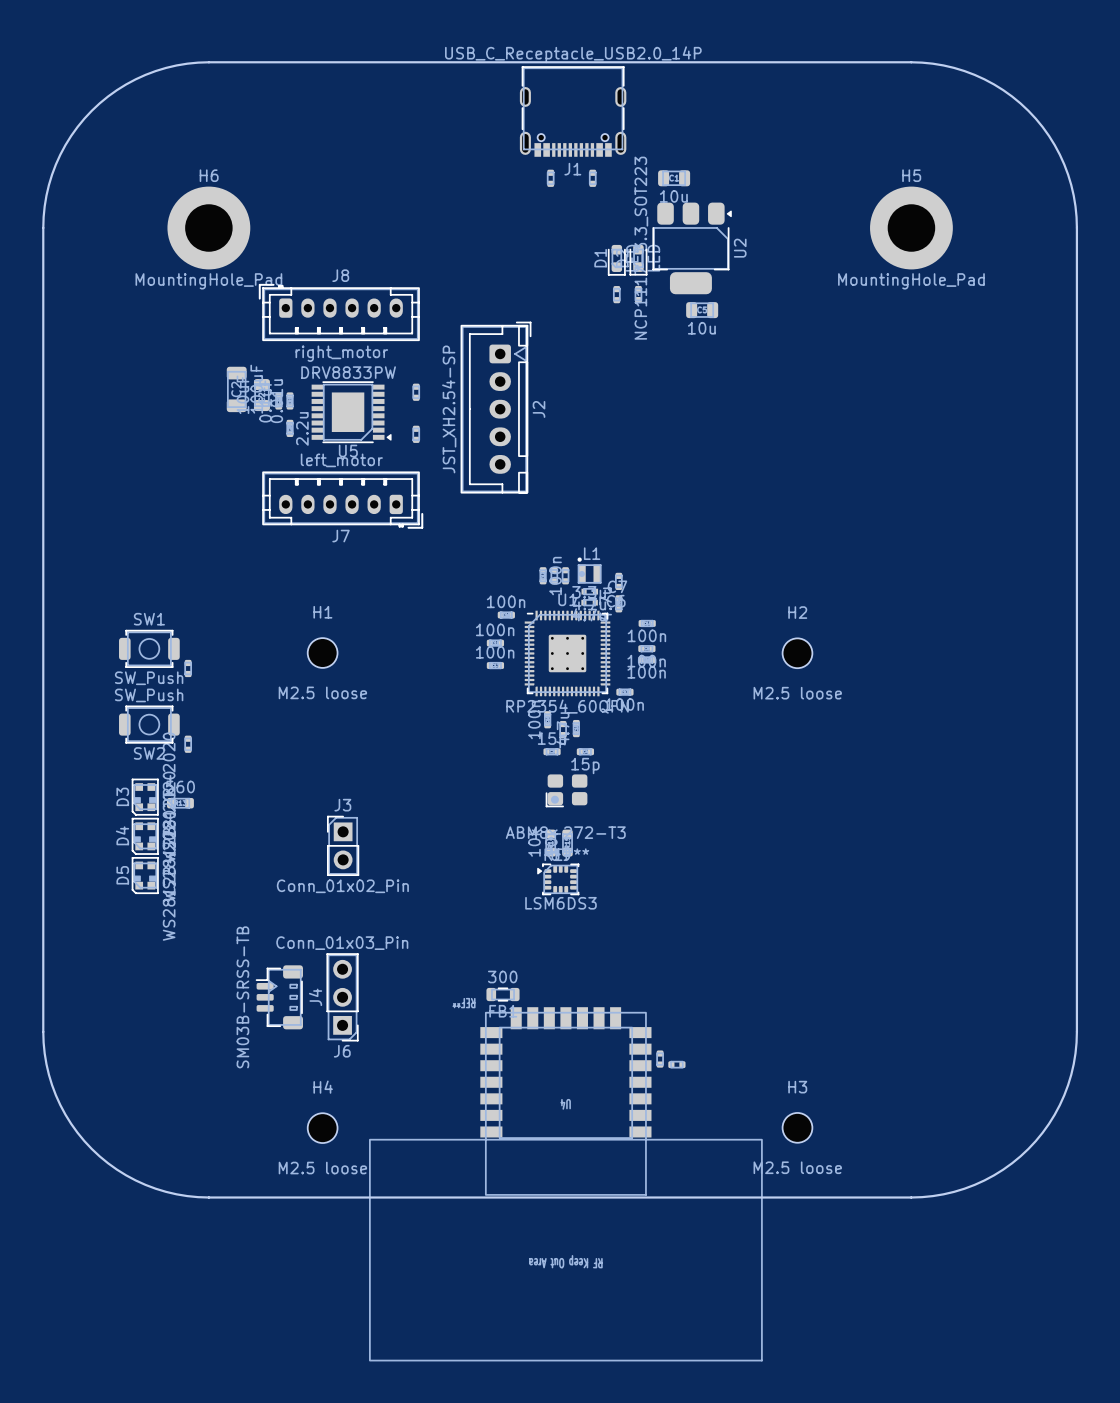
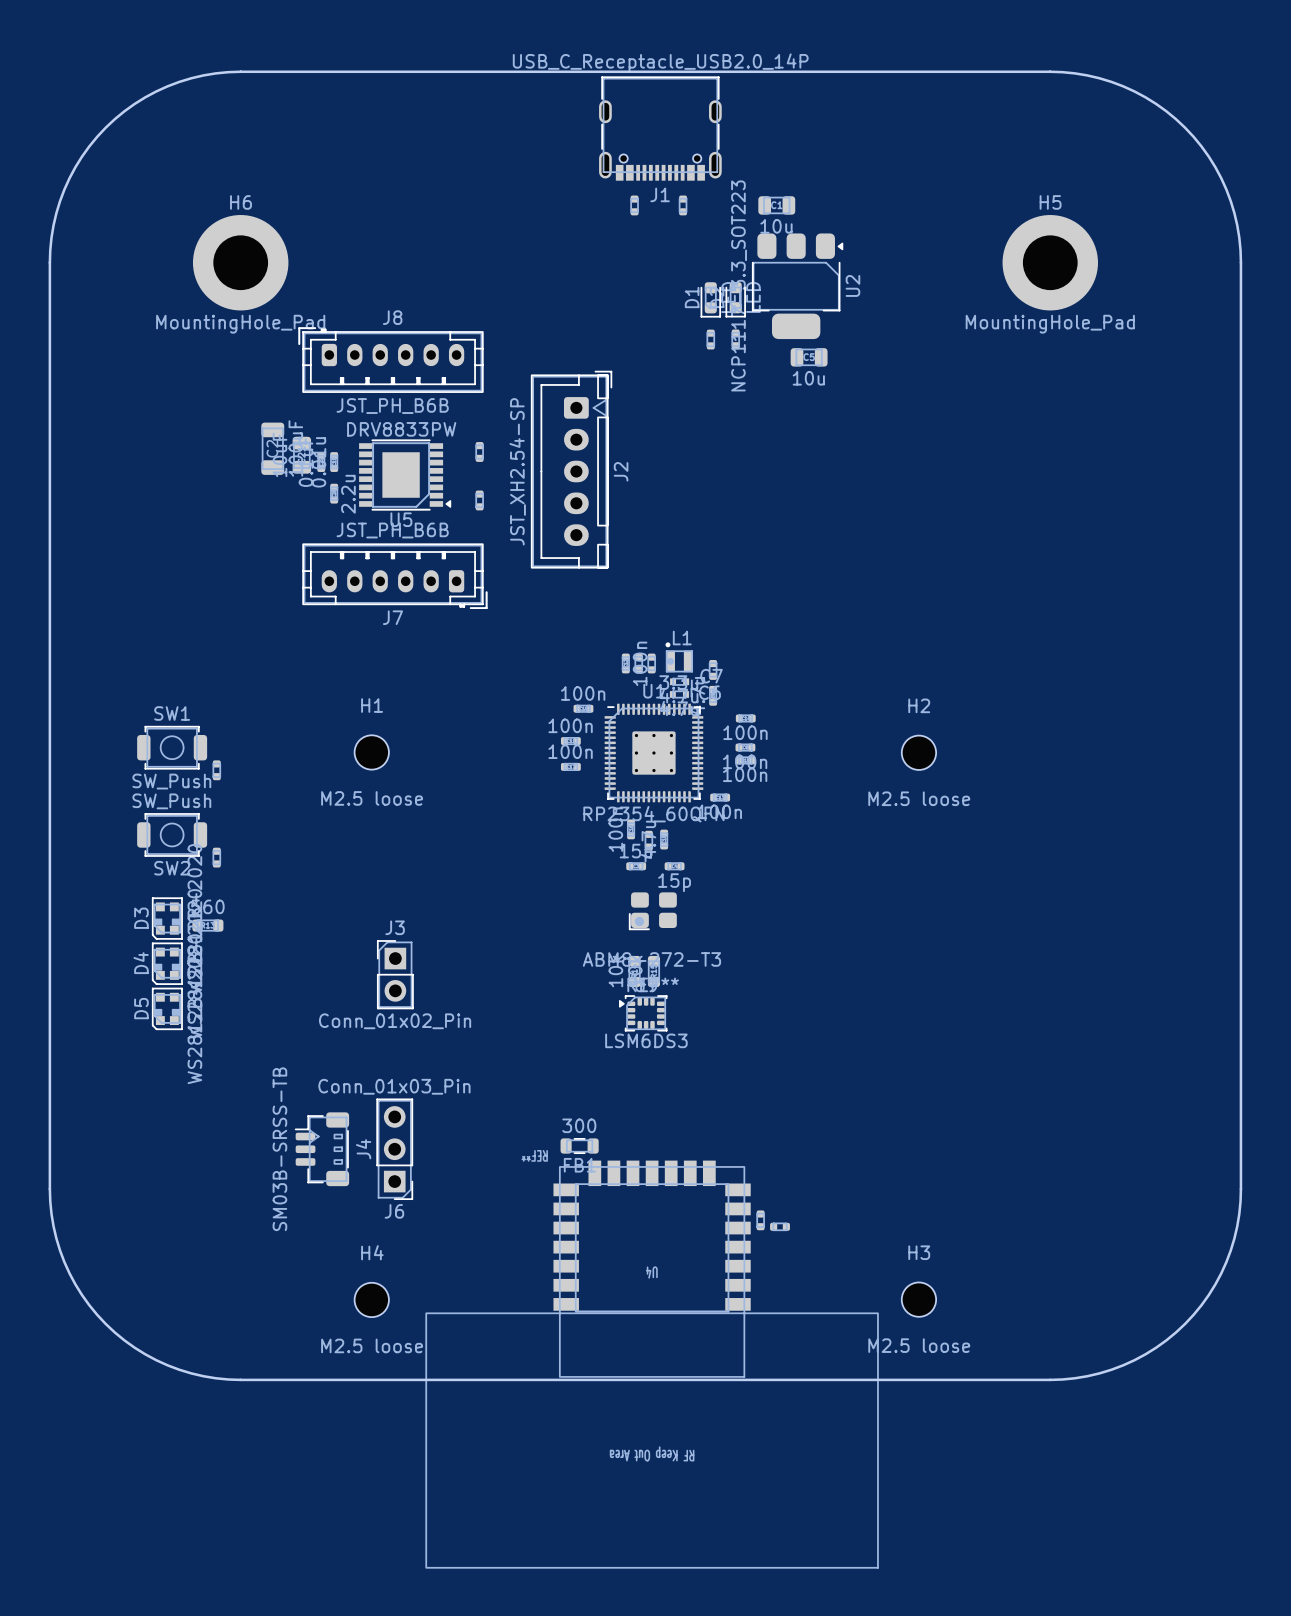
J8 value: right_motor (341, 353) -> JST_PH_B6B (392, 406)
J7 value: left_motor (341, 460) -> JST_PH_B6B (392, 530)

